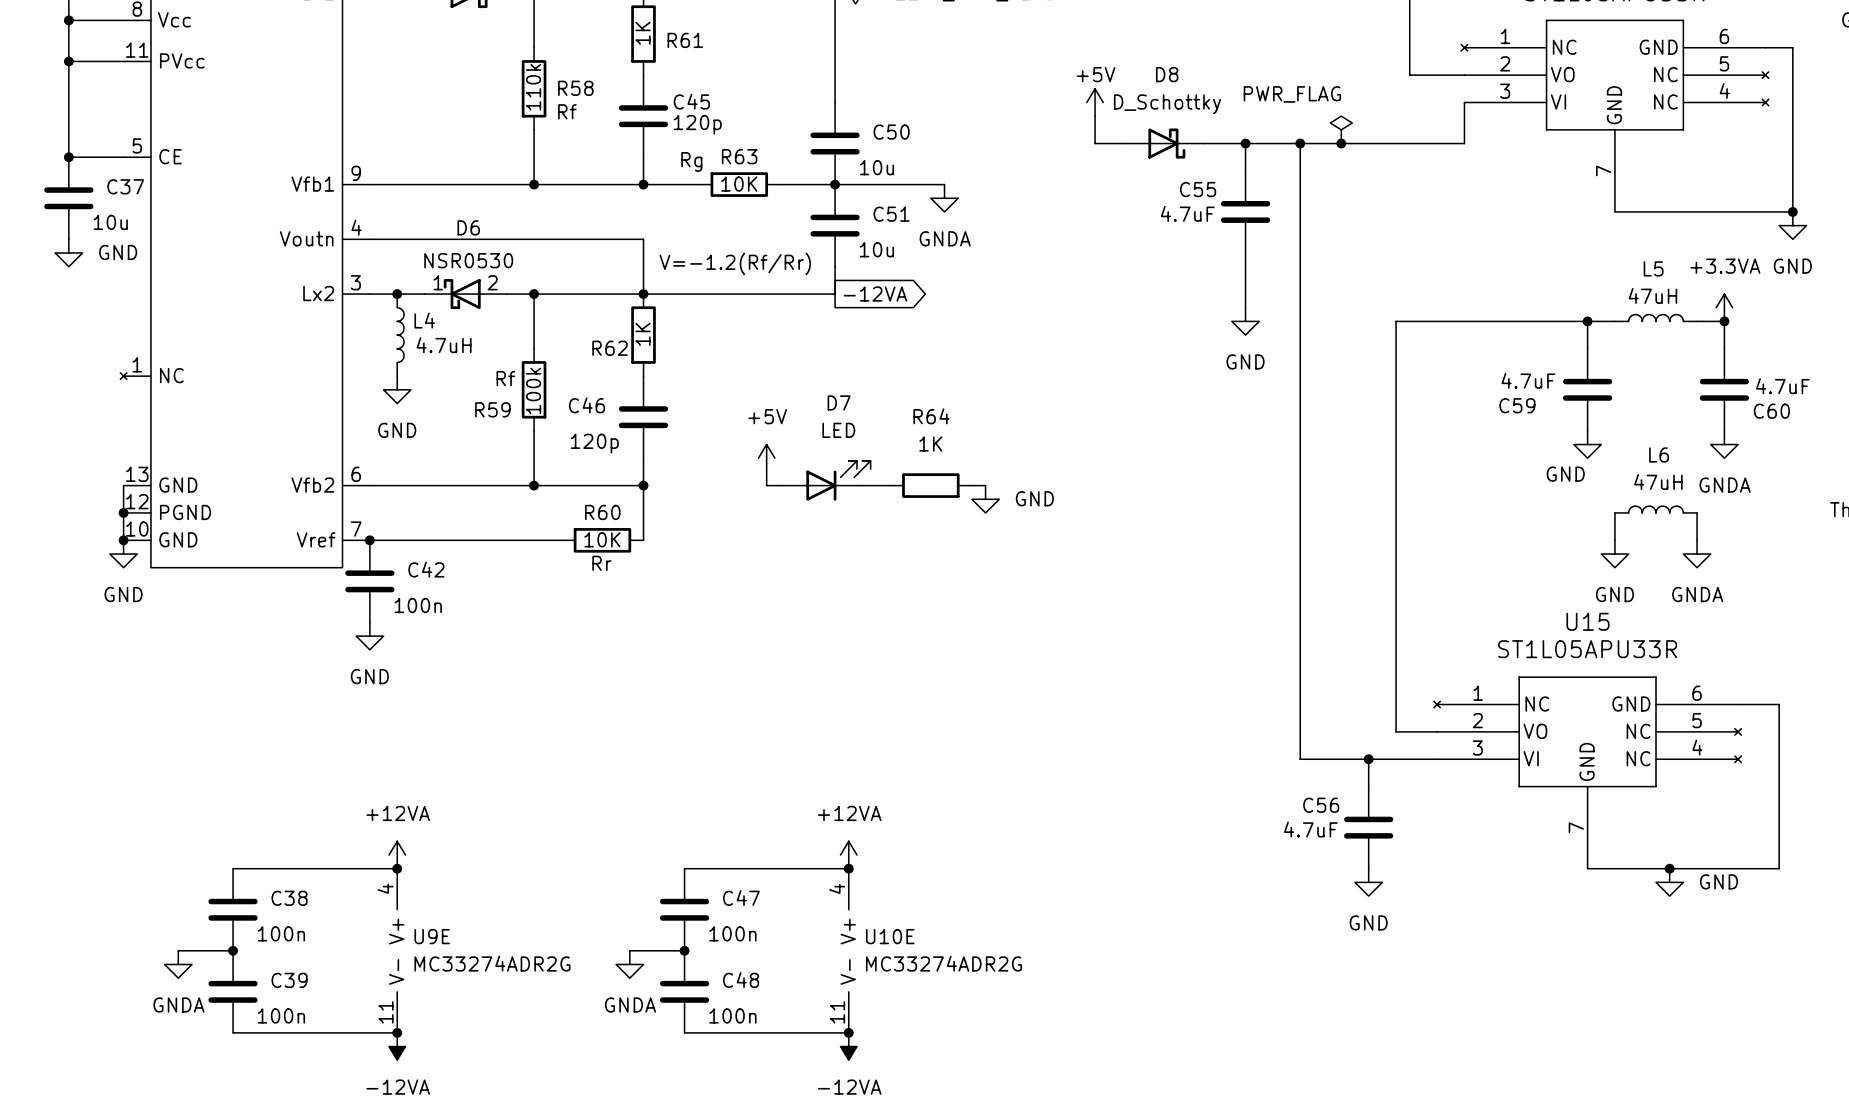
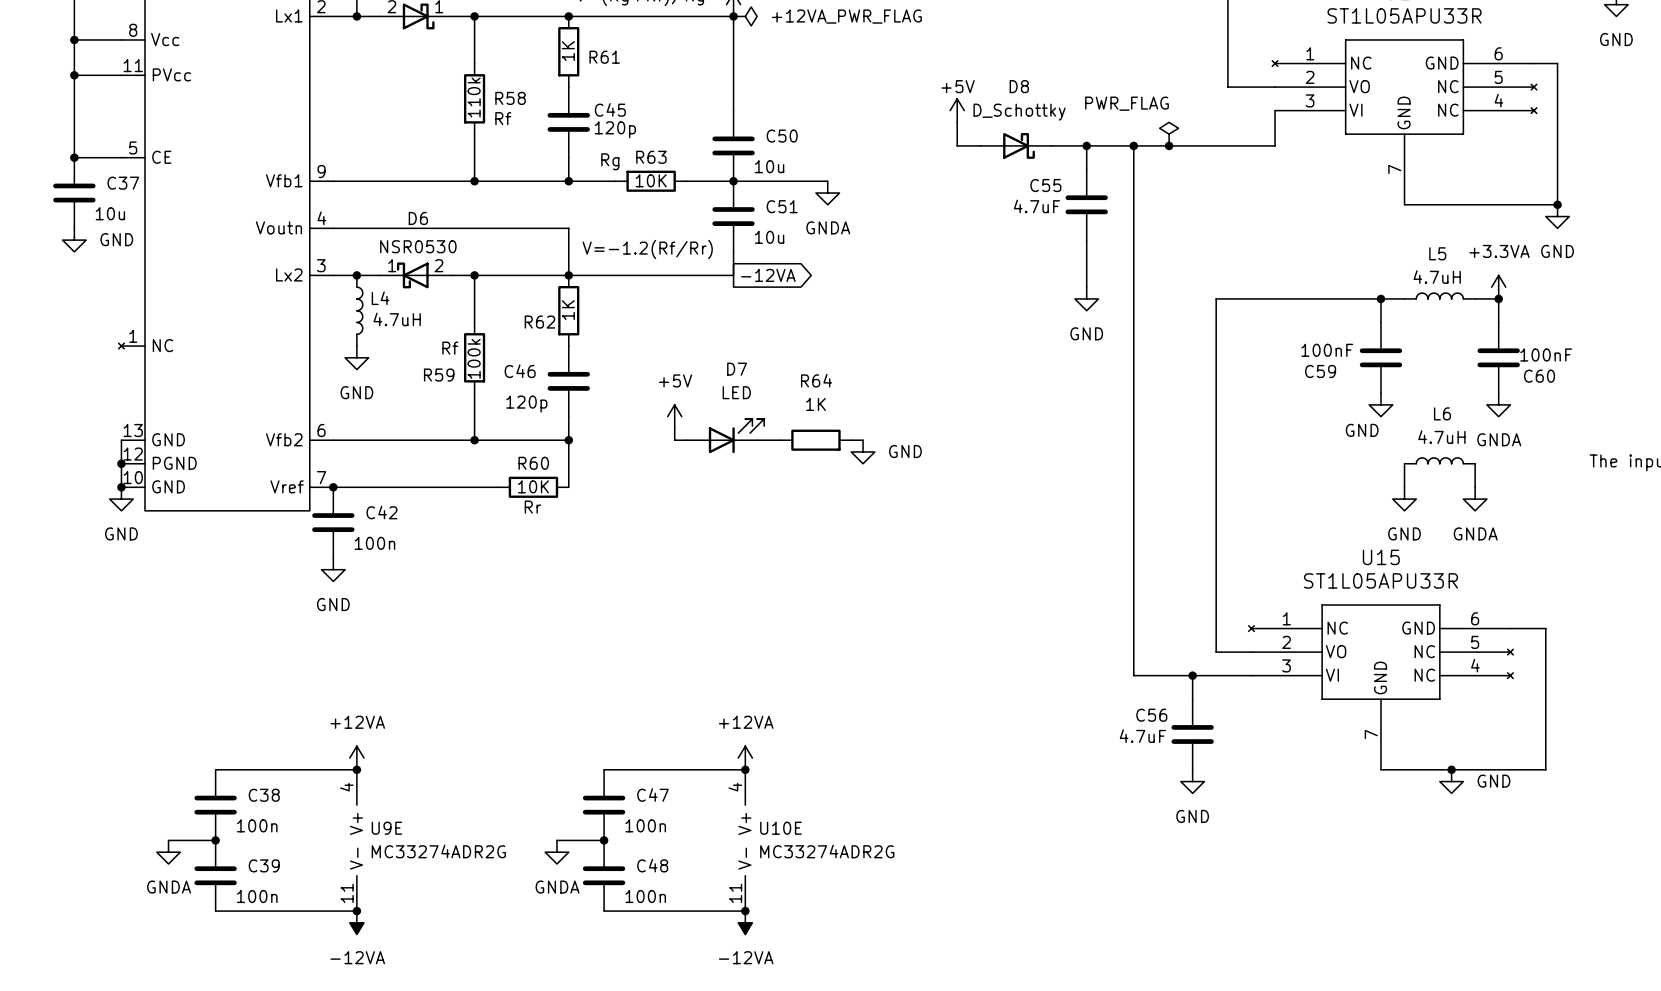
L5 value: 47uH (1652, 295) -> 4.7uH (1437, 277)
C59 value: 4.7uF (1528, 380) -> 100nF (1327, 350)
C60 value: 4.7uF (1782, 386) -> 100nF (1546, 355)
L6 value: 47uH (1658, 482) -> 4.7uH (1441, 437)

